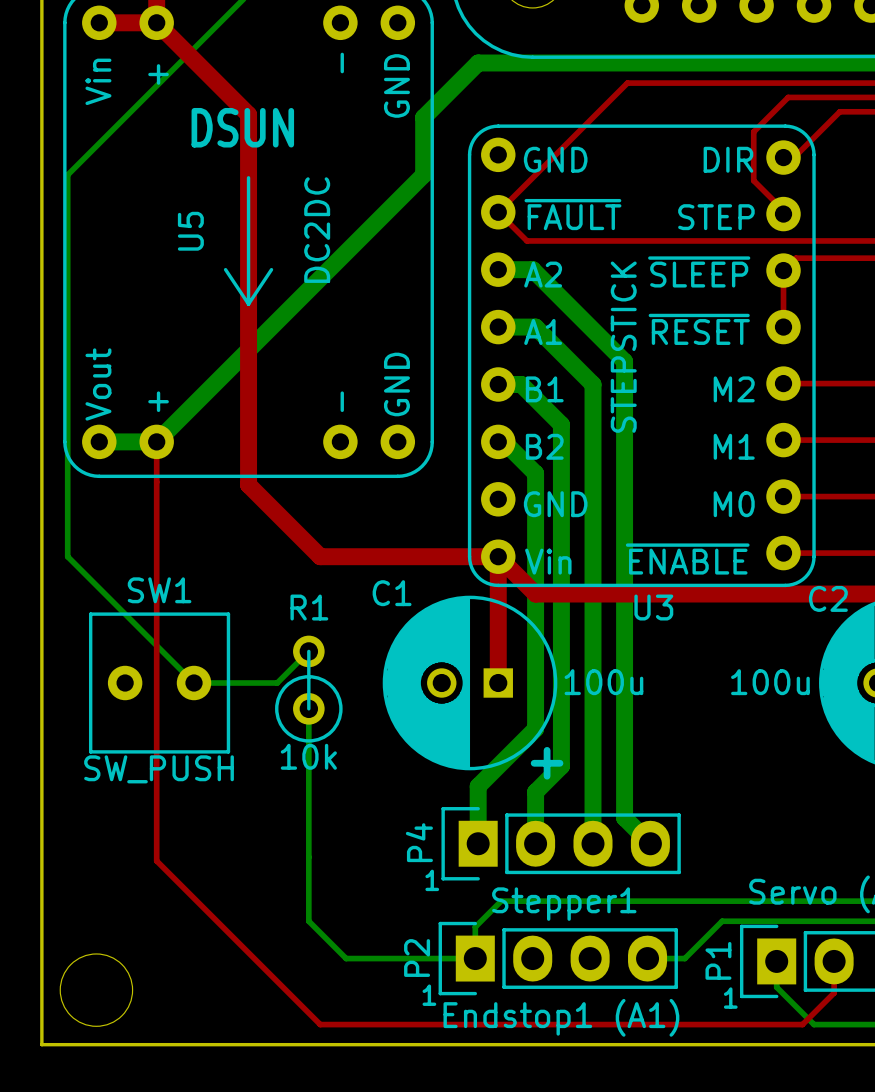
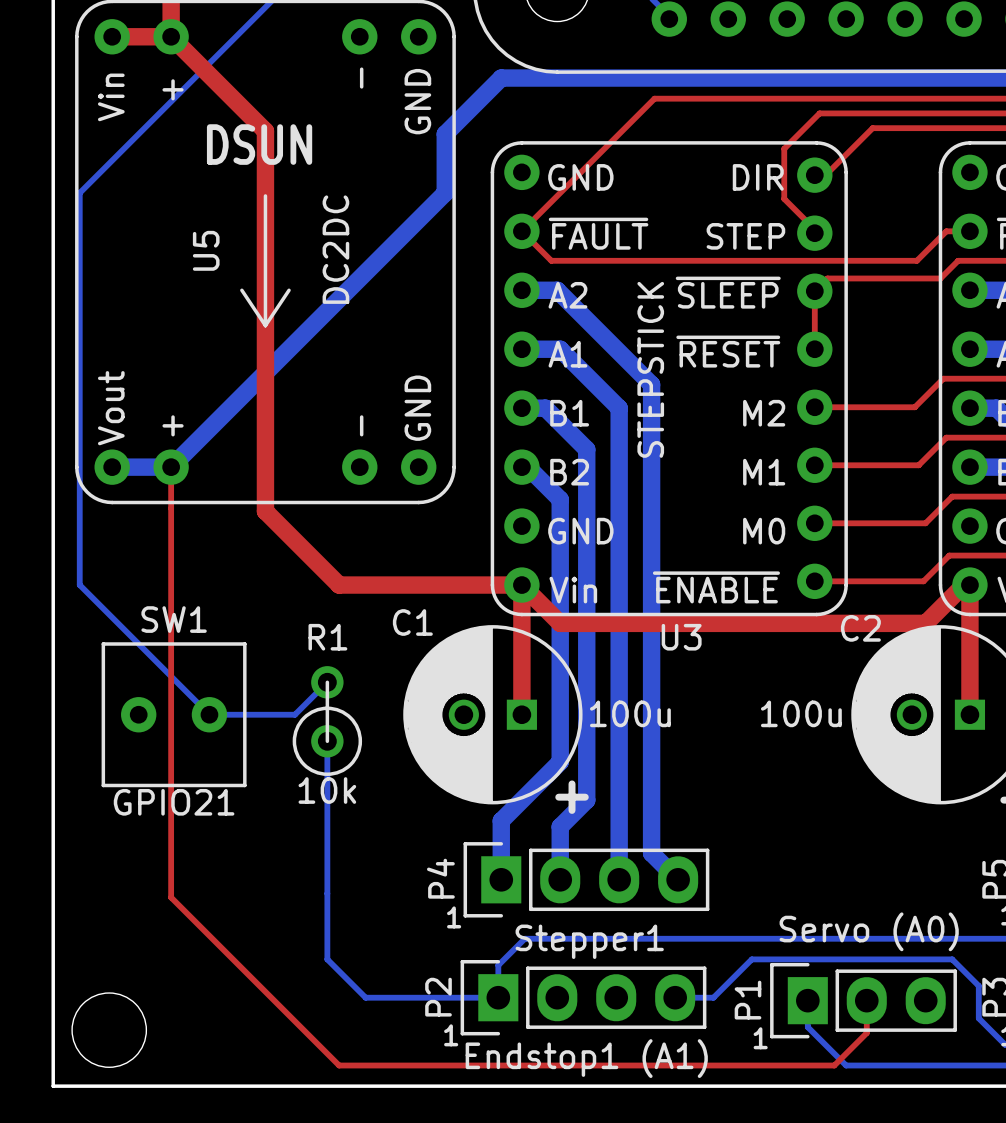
SW1 value: SW_PUSH (159, 769) -> GPIO21 (174, 802)

